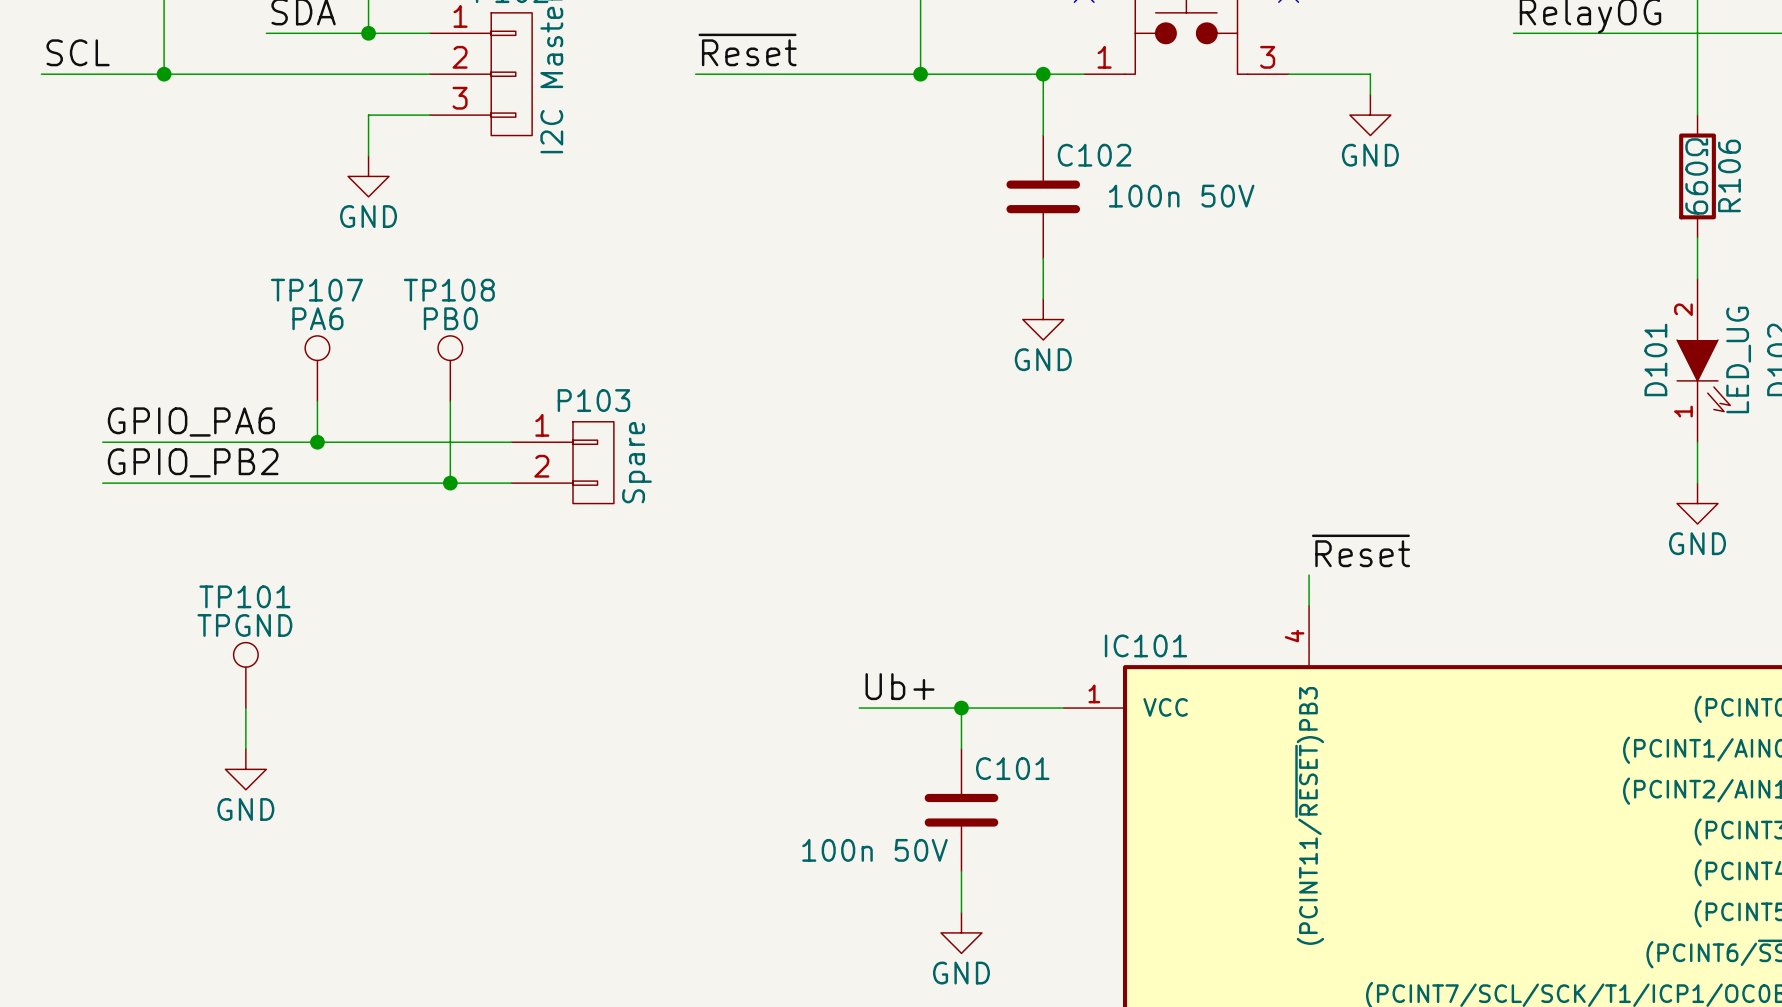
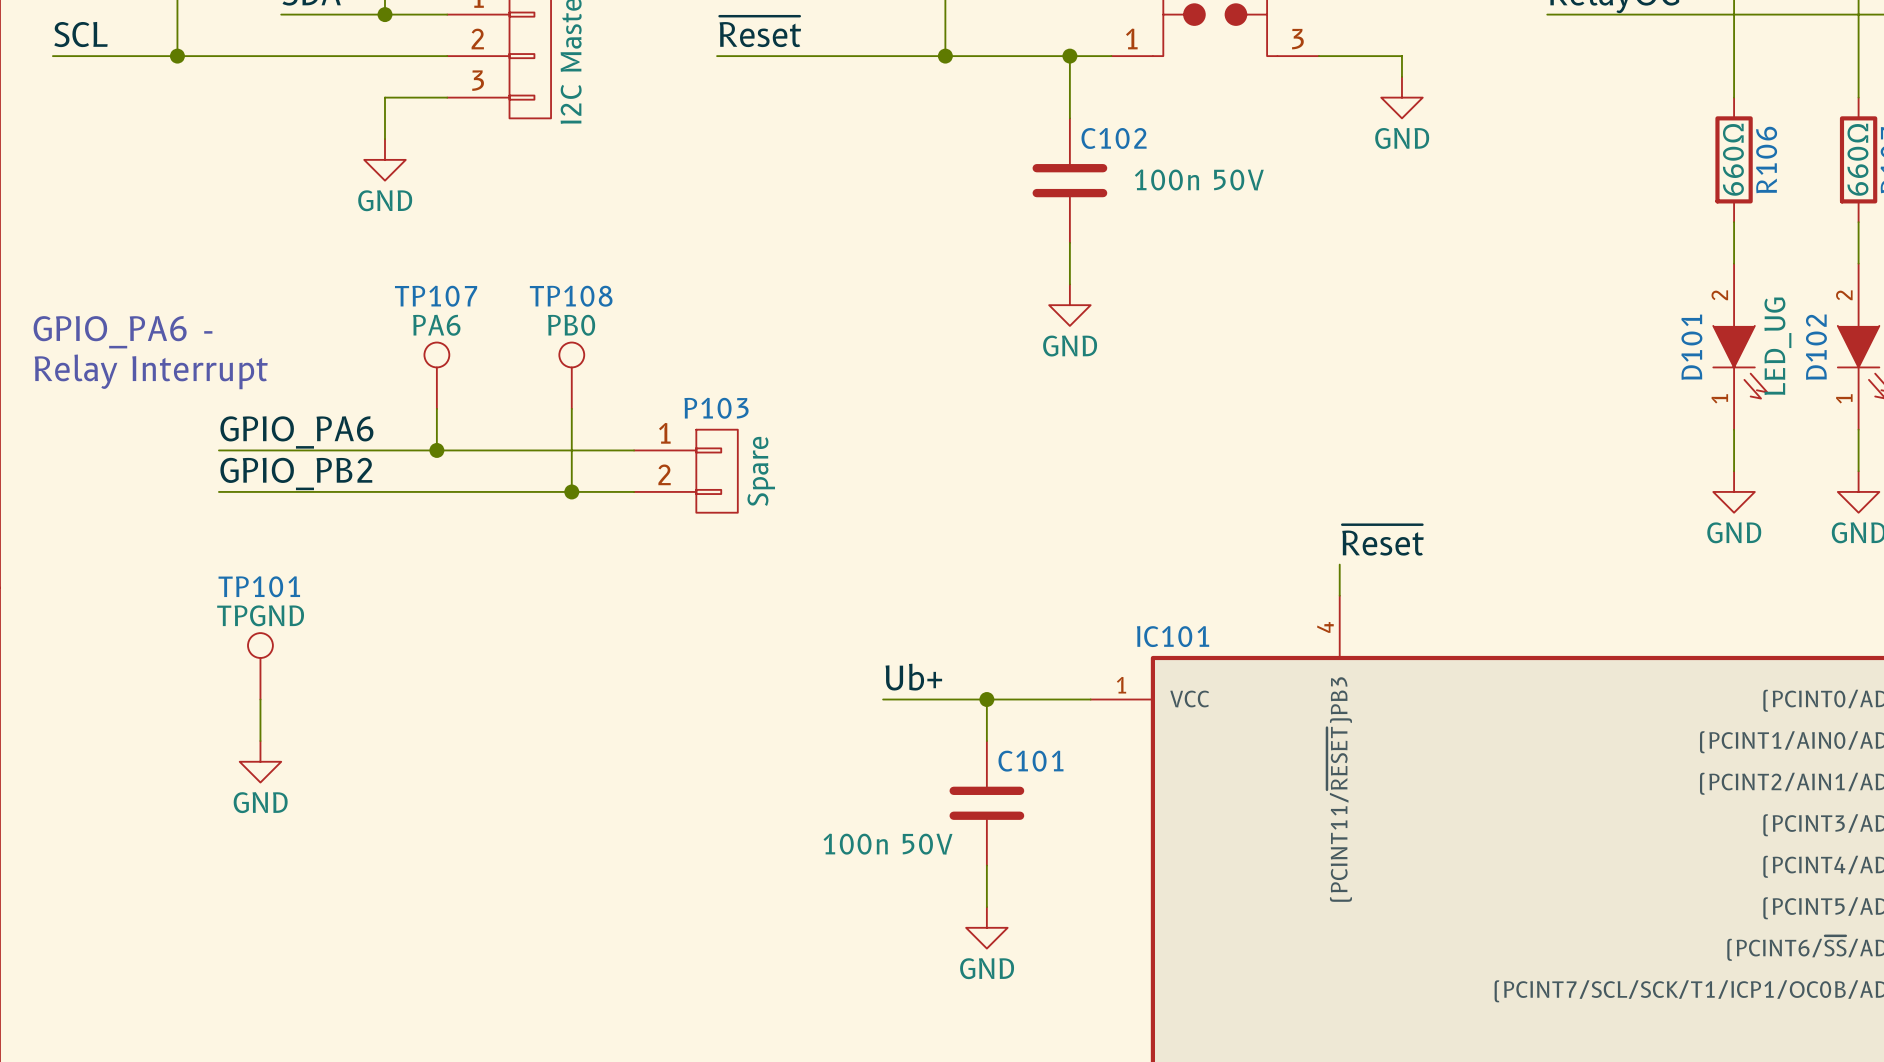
text: none -> GPIO_PA6 - (123, 332)
TP107 position: (317, 368) -> (436, 375)
TP108 position: (450, 368) -> (571, 375)
text: none -> Relay Interrupt (151, 371)
wire: (317, 401) (317, 442) -> (436, 408) (436, 450)
wire: (450, 401) (450, 483) -> (571, 408) (571, 491)
label position: GPIO_PA6 (191, 421) -> GPIO_PA6 (296, 432)
wire: (102, 442) (511, 442) -> (218, 450) (634, 450)
junction: (317, 442) -> none
label position: GPIO_PB2 (193, 462) -> GPIO_PB2 (296, 473)
P103 position: (562, 462) -> (685, 471)
wire: (102, 483) (511, 483) -> (218, 491) (634, 491)
junction position: (450, 483) -> (436, 450)
junction: none -> (571, 491)

